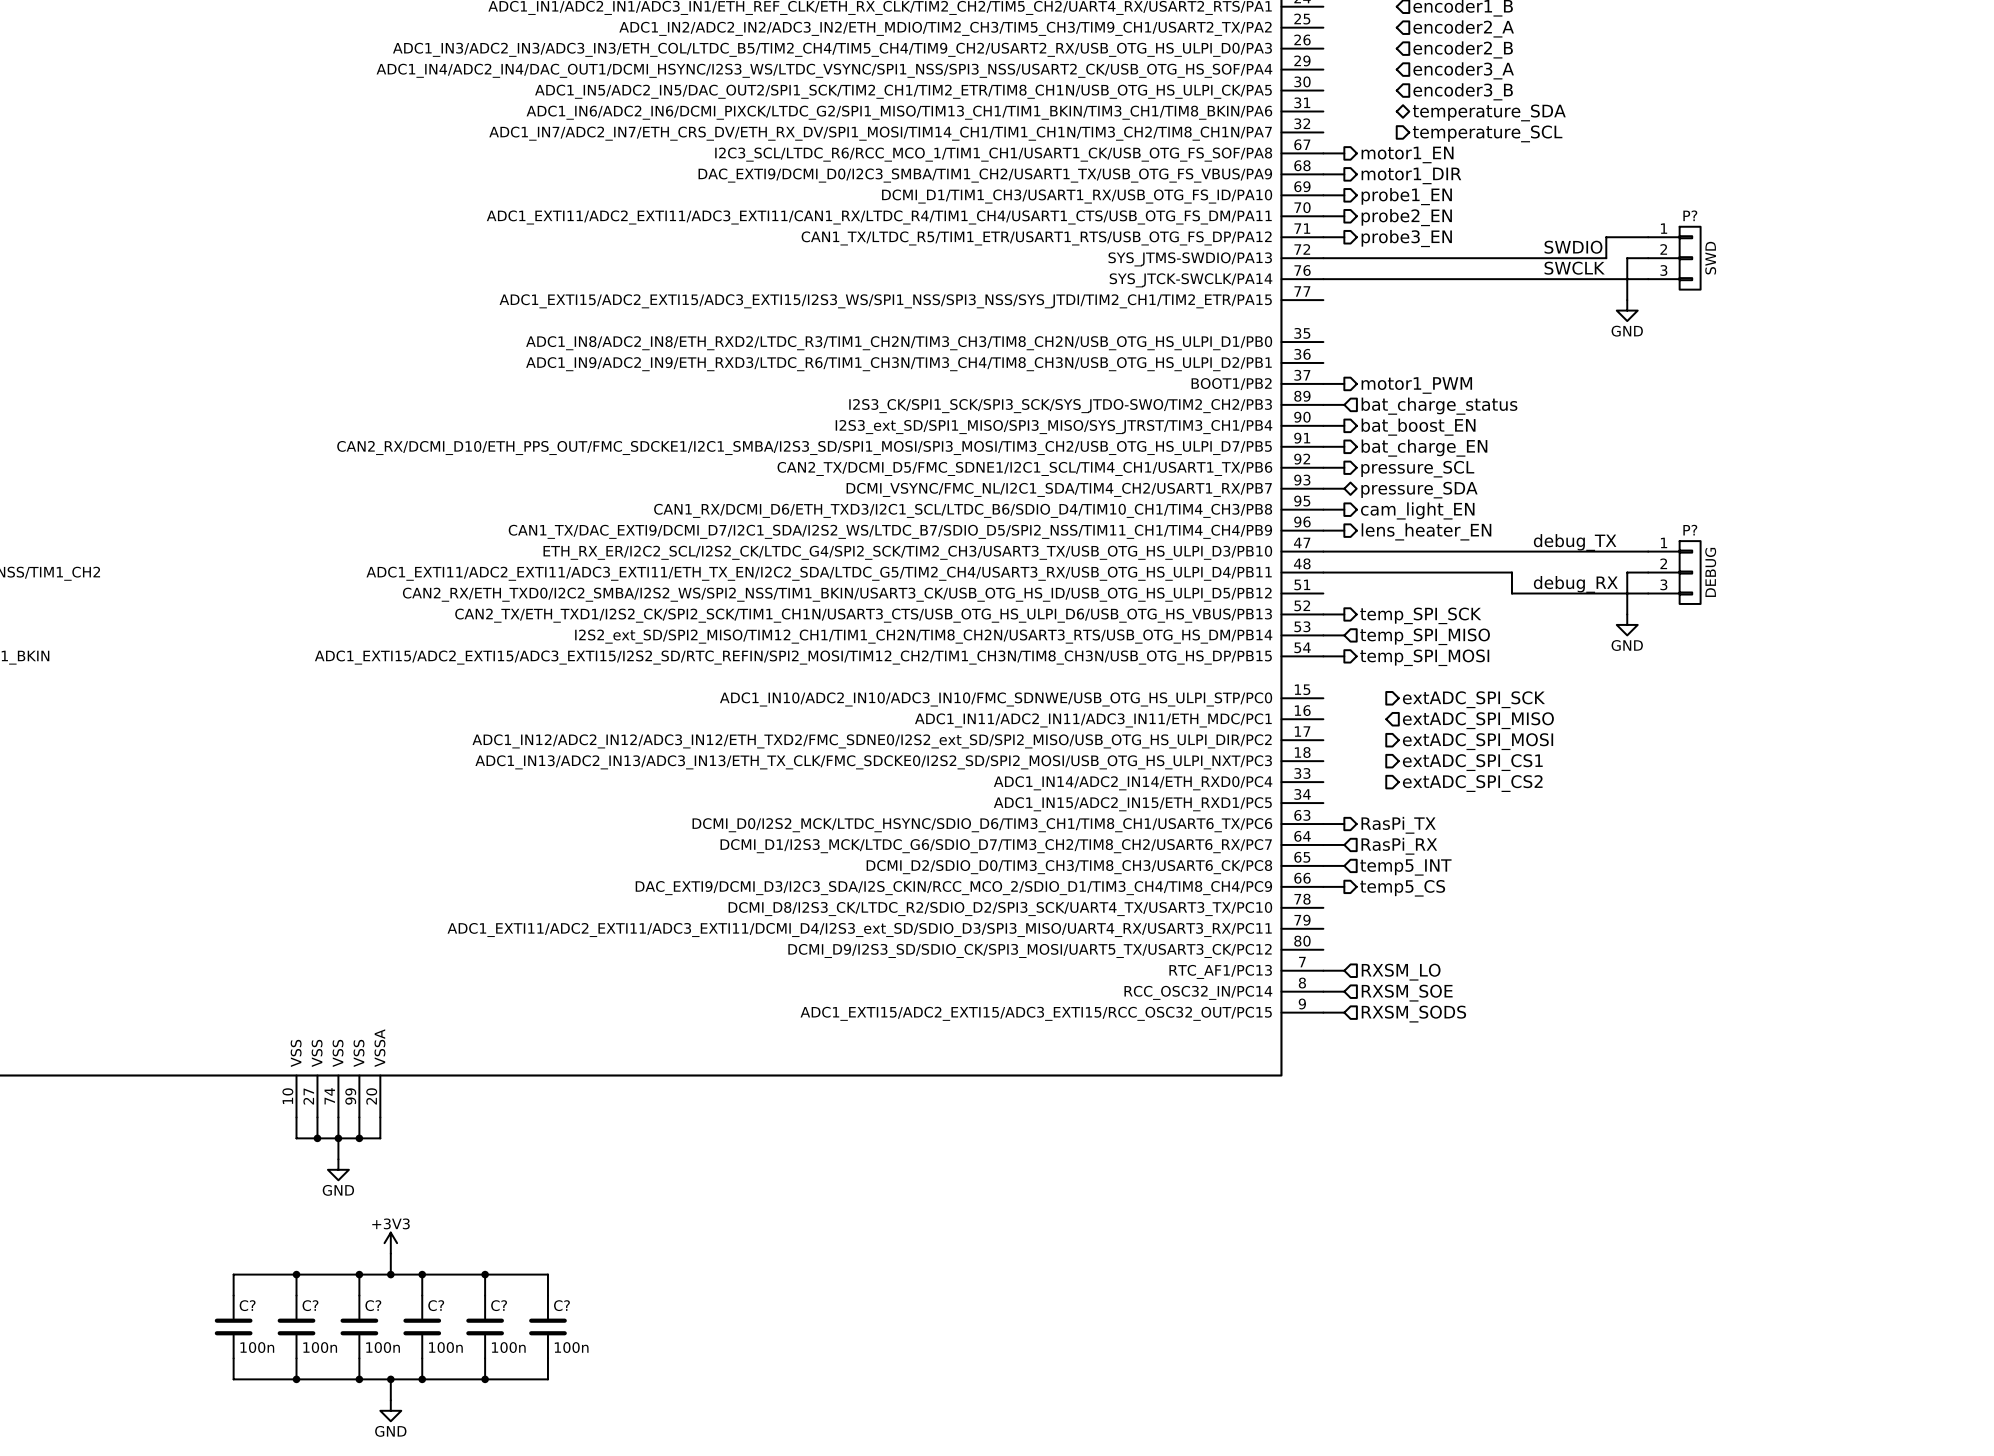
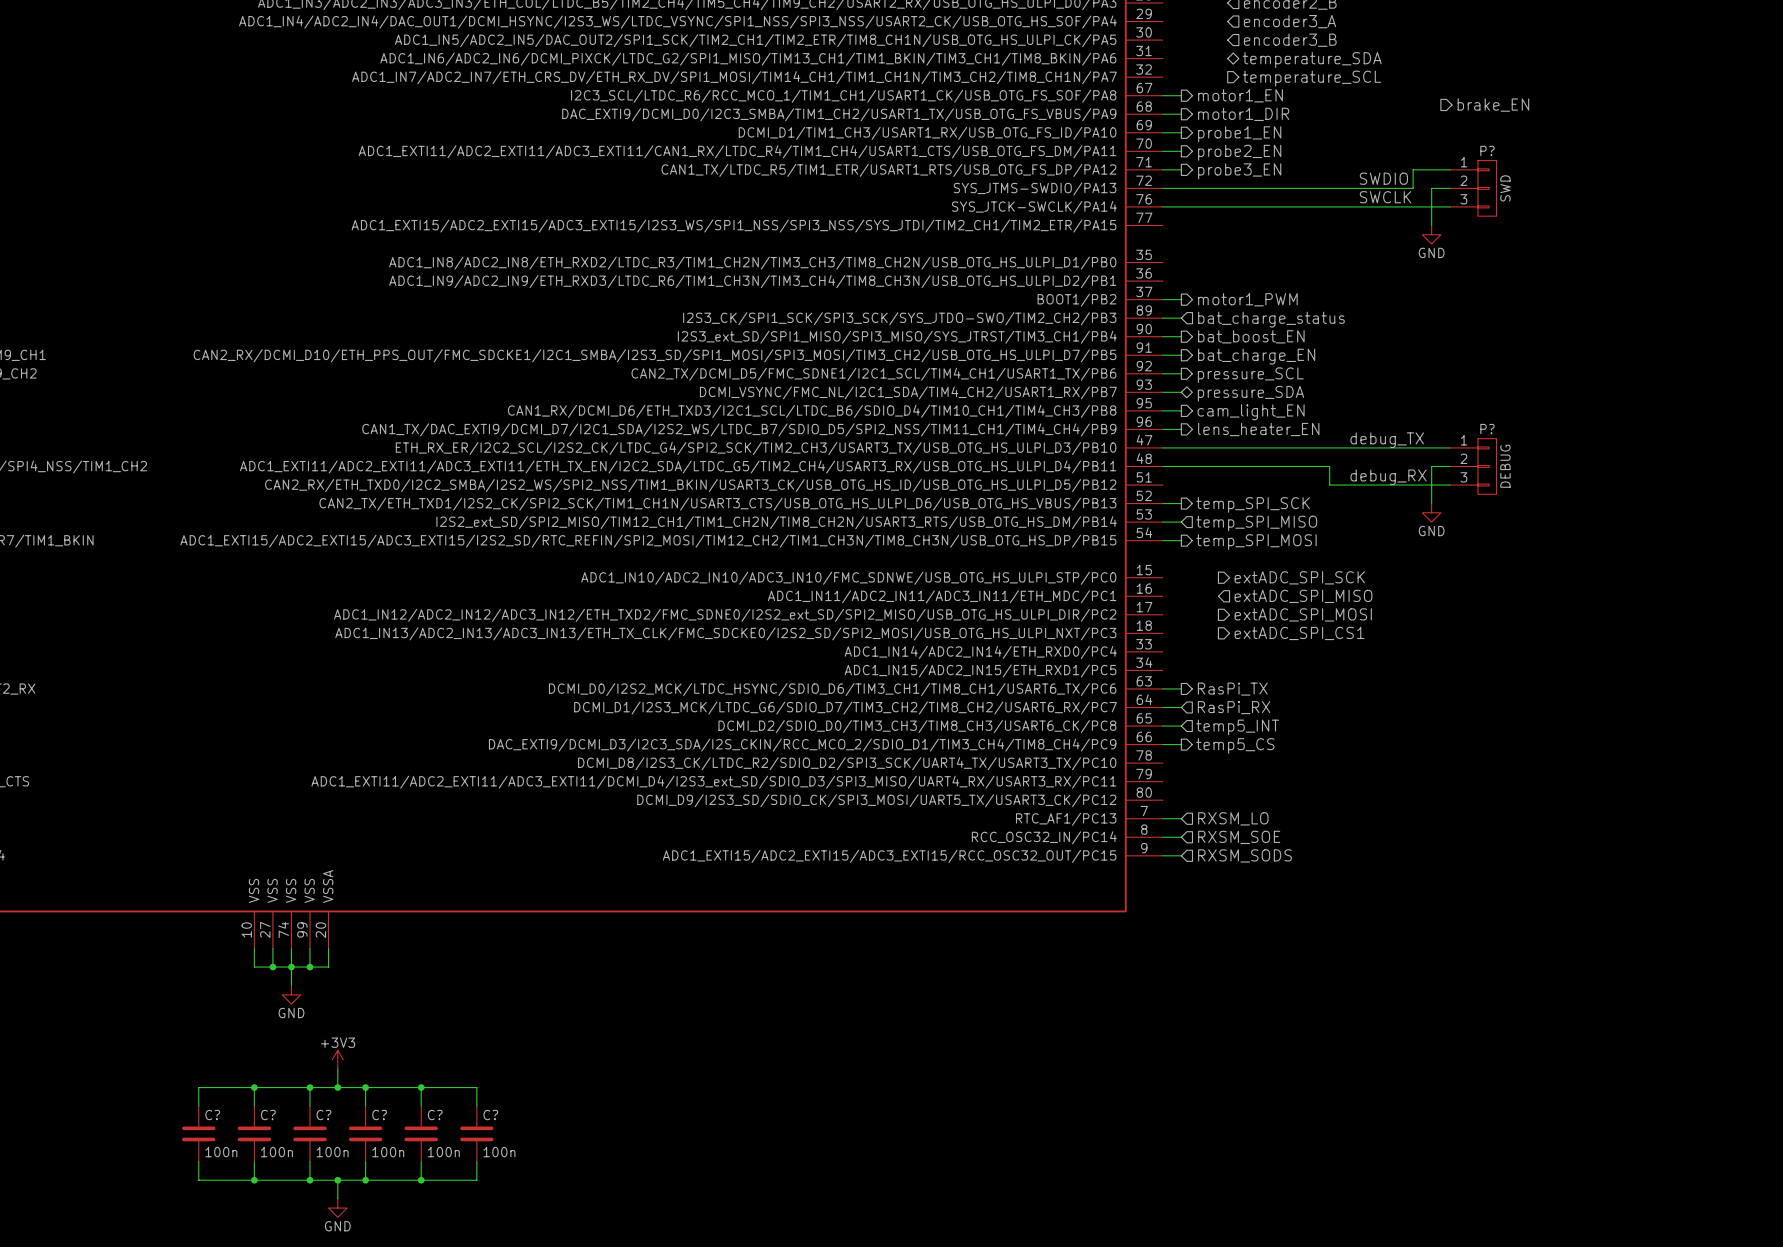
hierarchical label: none -> brake_EN (1493, 105)
hierarchical label: extADC_SPI_CS2 (1472, 783) -> none

